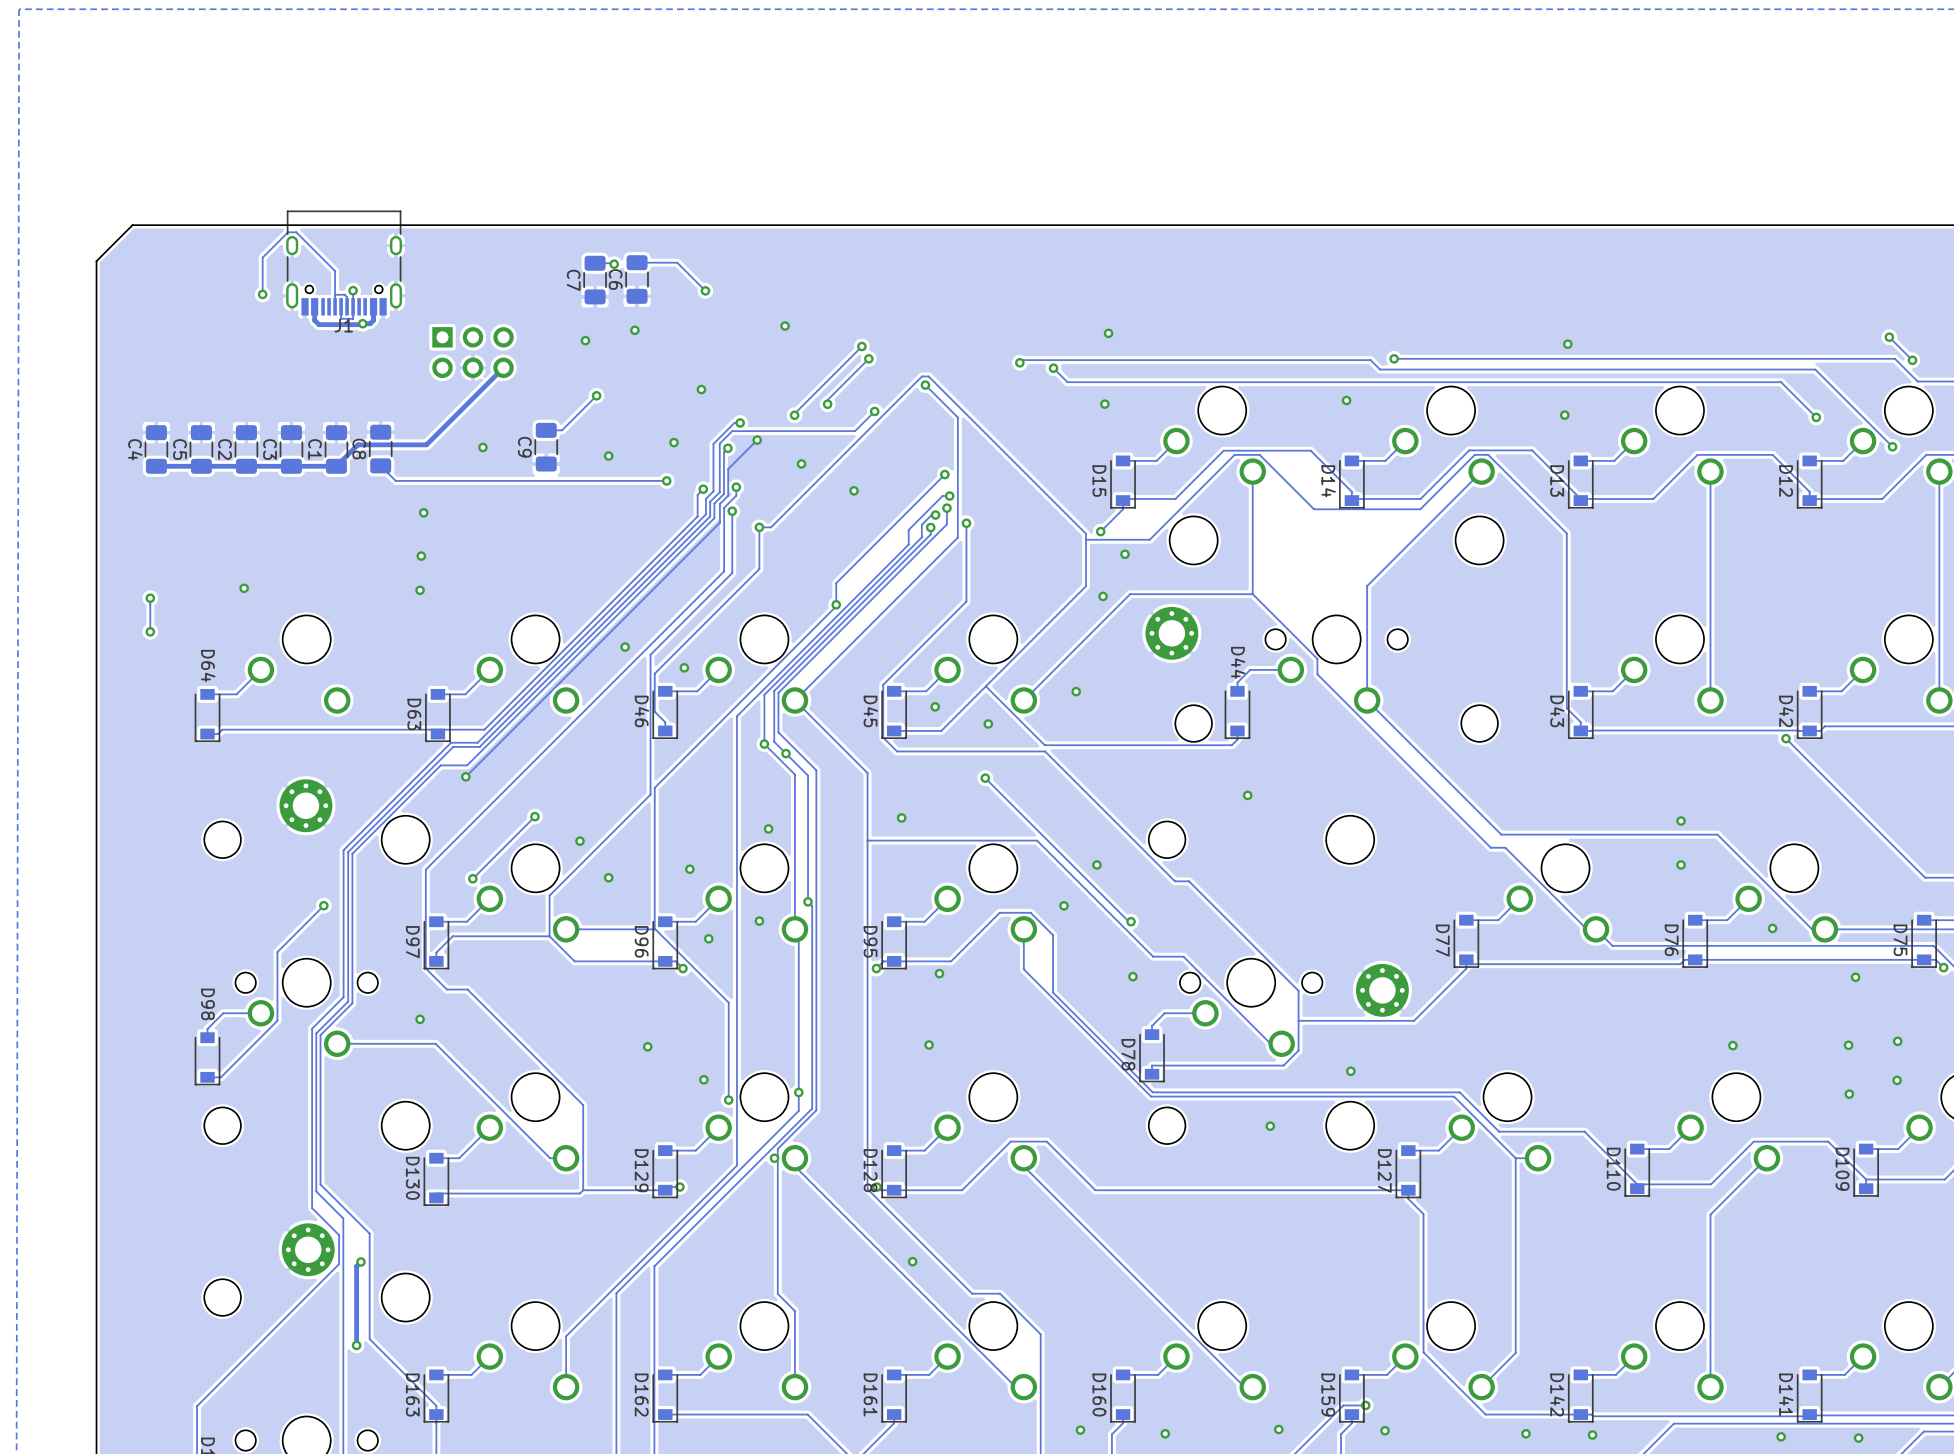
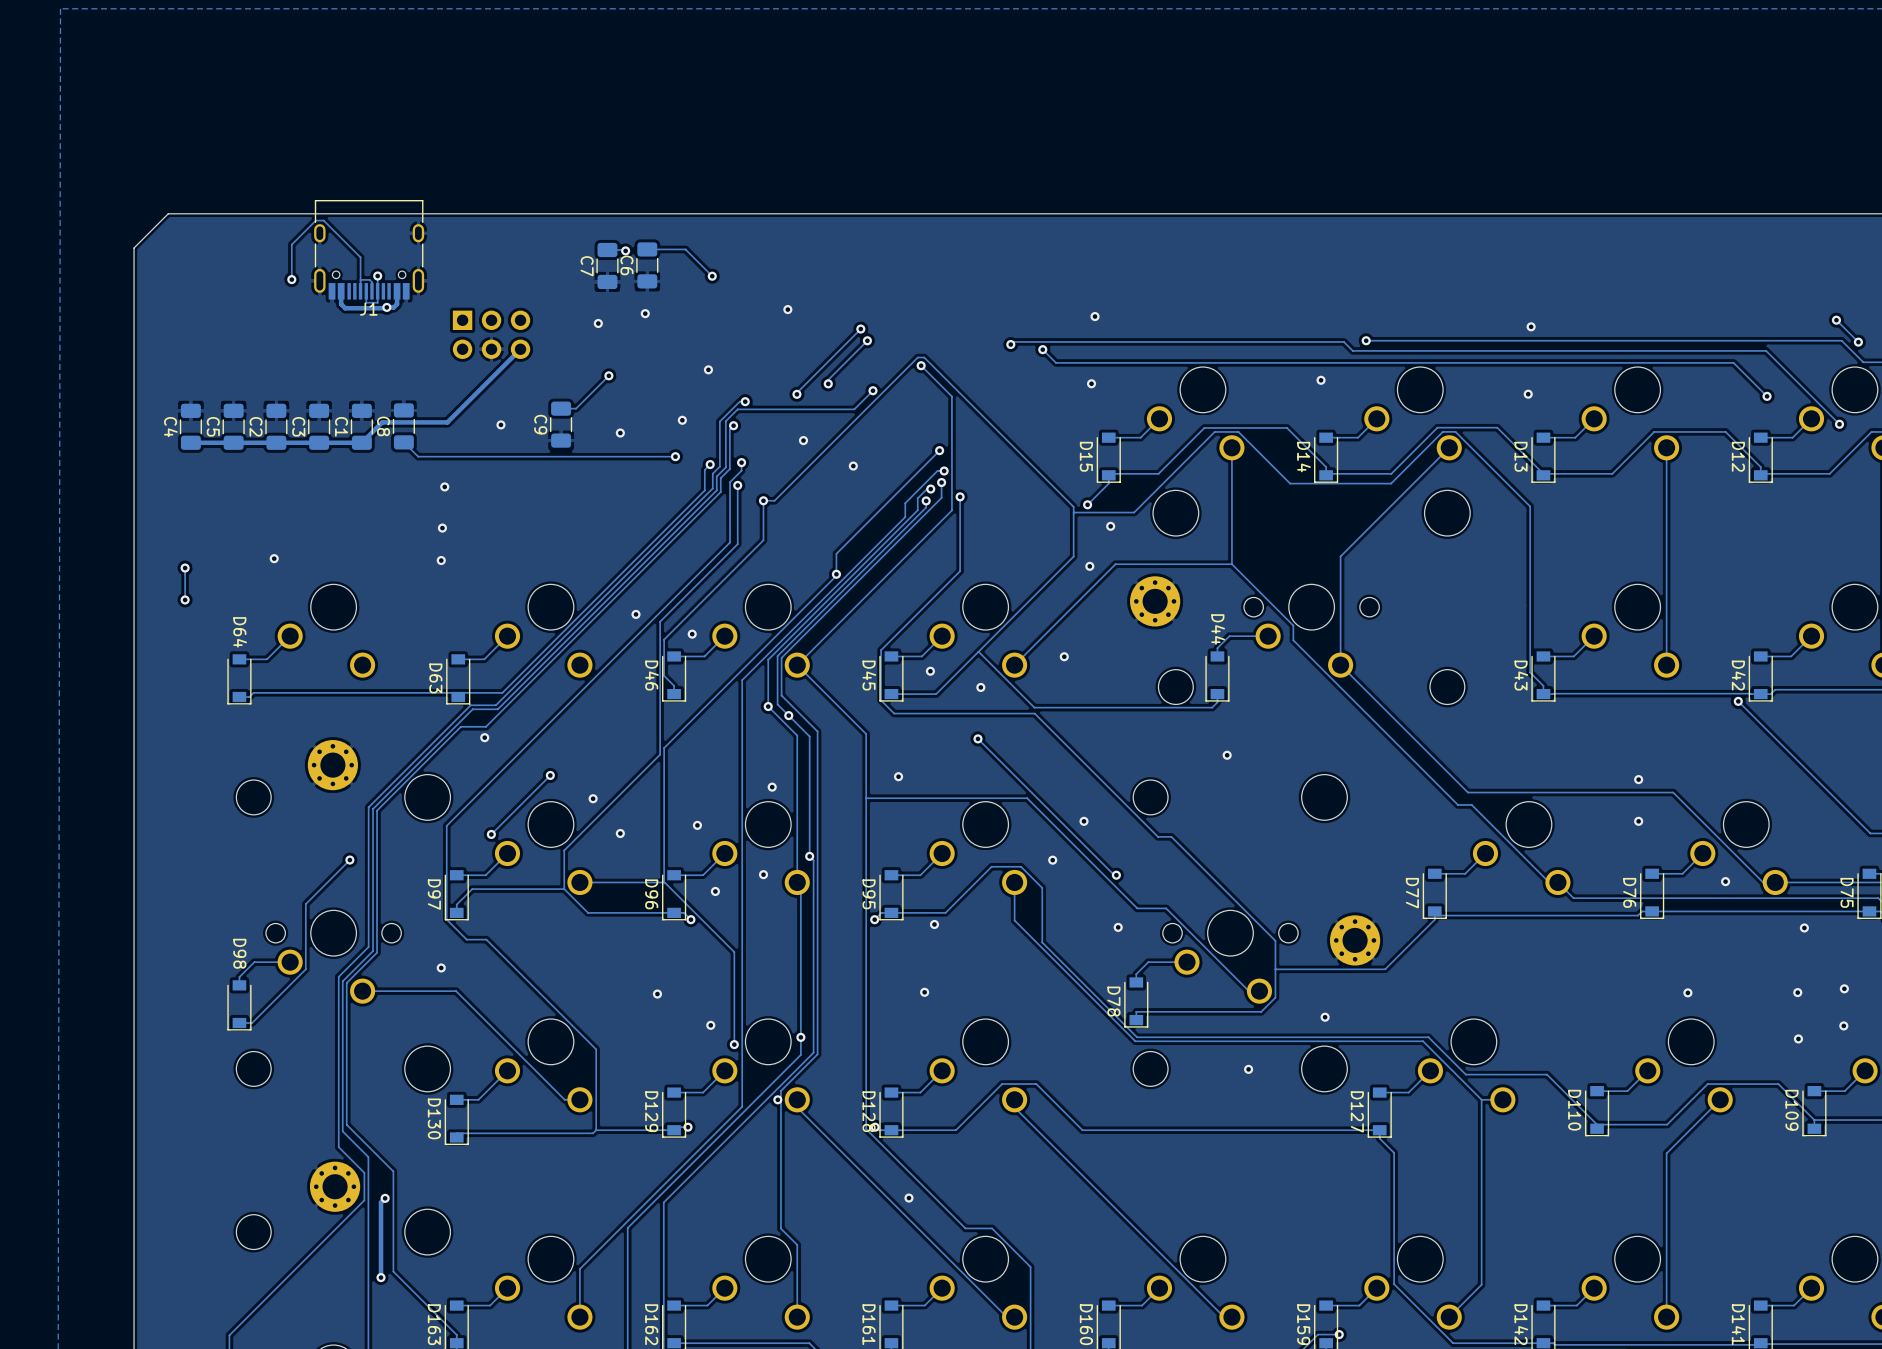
track: (757, 440) (728, 469) (728, 495) (719, 503) (719, 522) (465, 776) -> none
via: (757, 440) -> none

